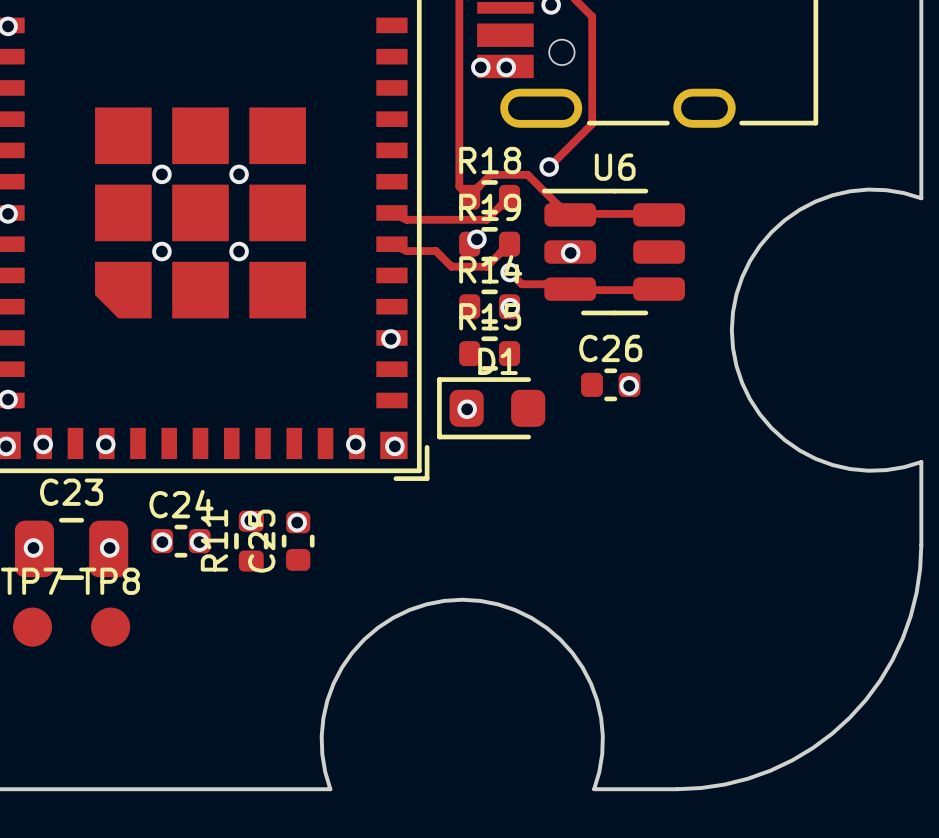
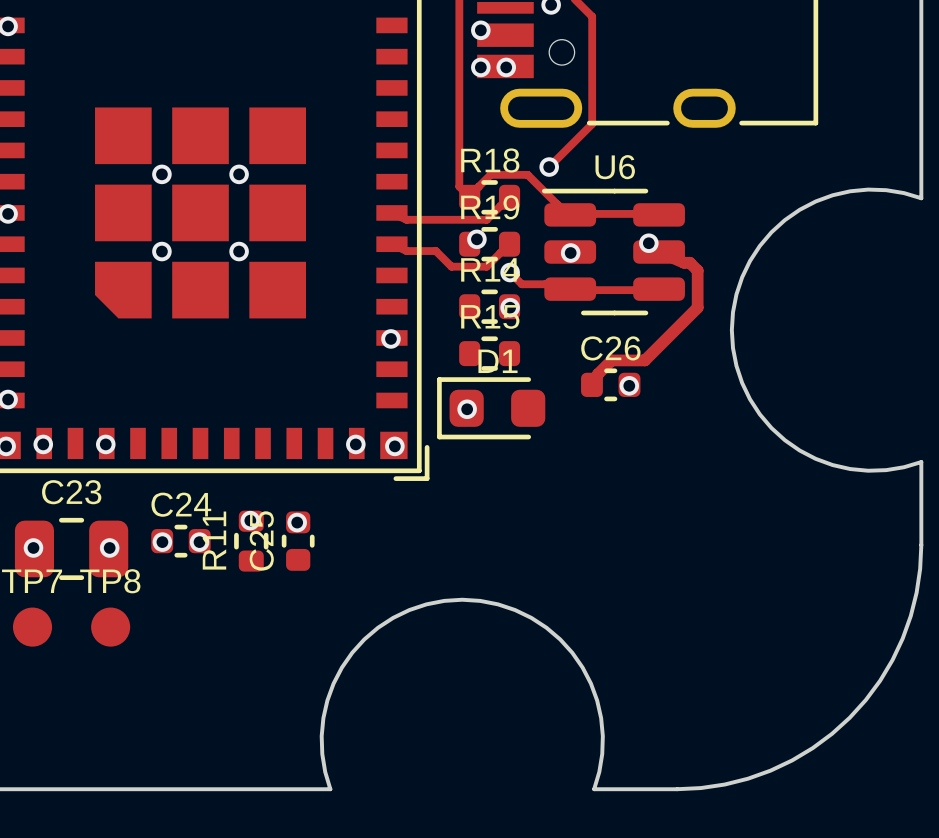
via: none -> (480, 30)
track: none -> (648, 243) (659, 252) (683, 262) (689, 262) (697, 270) (697, 307) (644, 360) (611, 360) (598, 374) (591, 384)
via: none -> (648, 243)

